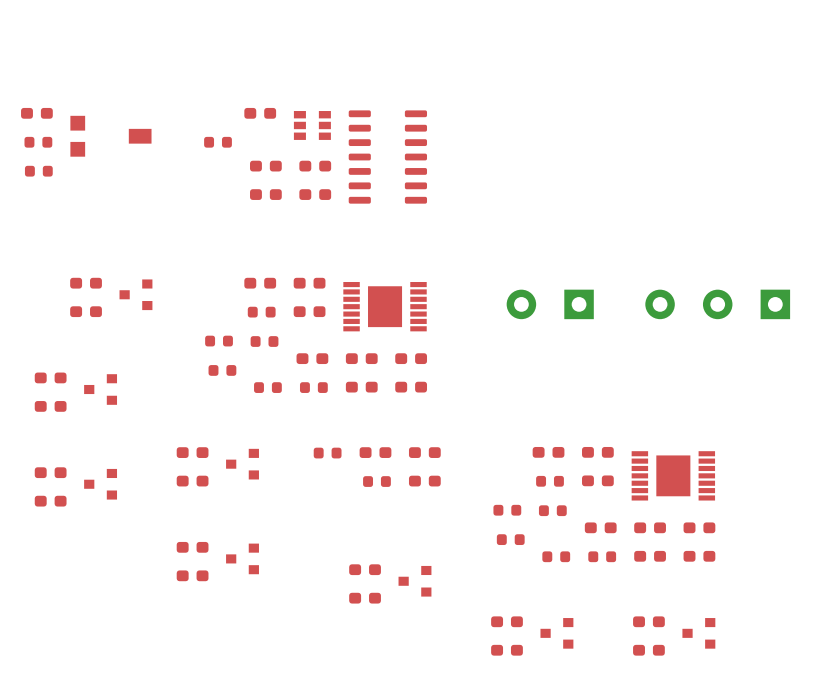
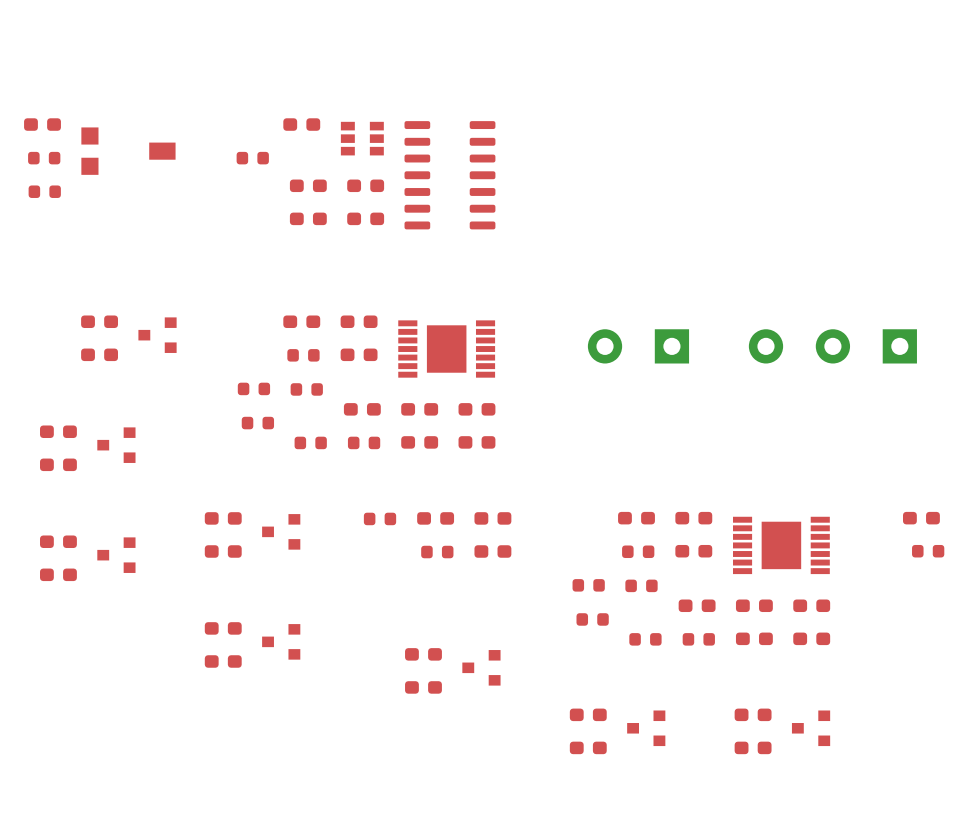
part: none -> (921, 518)
part: none -> (928, 551)

